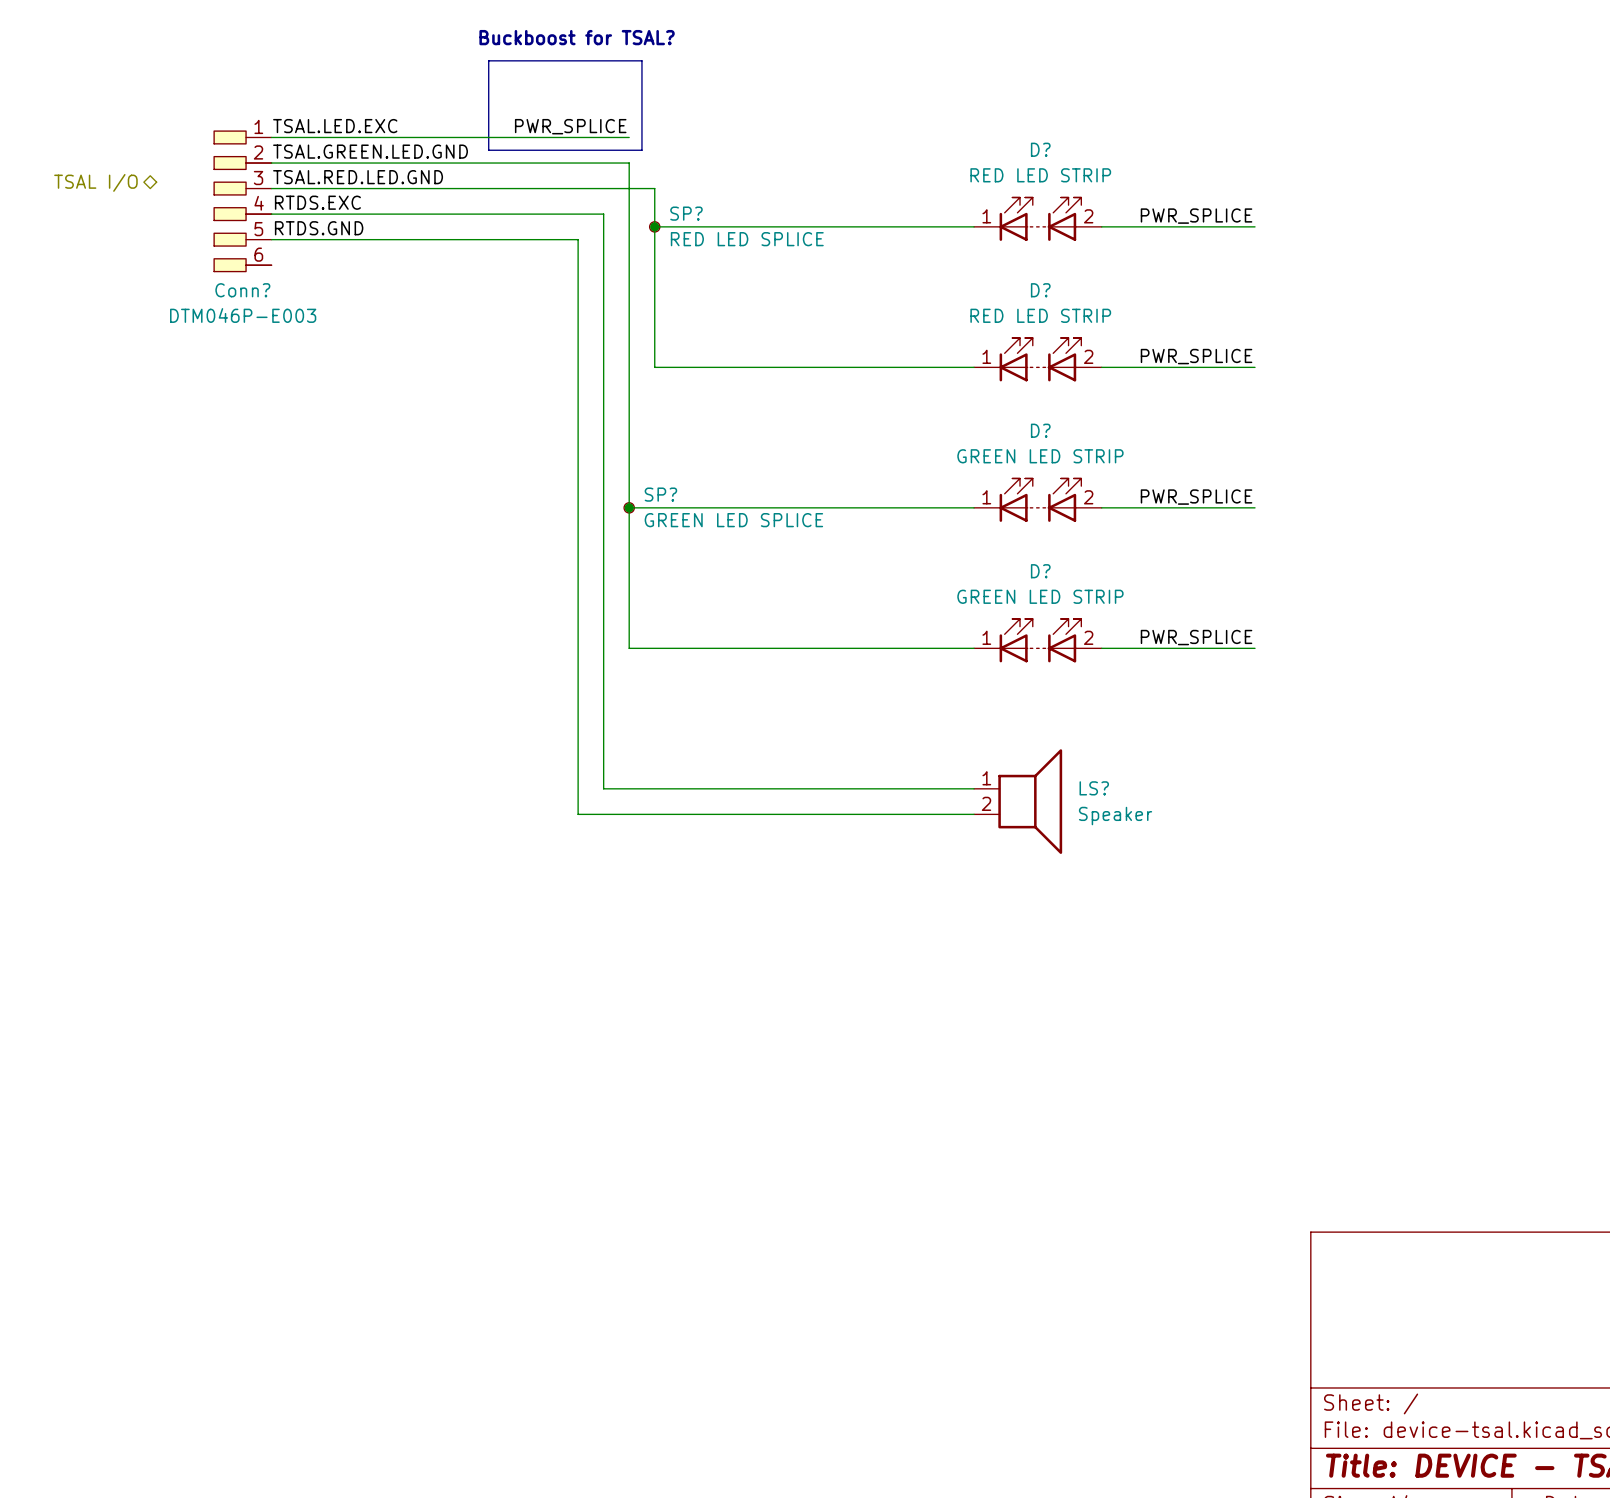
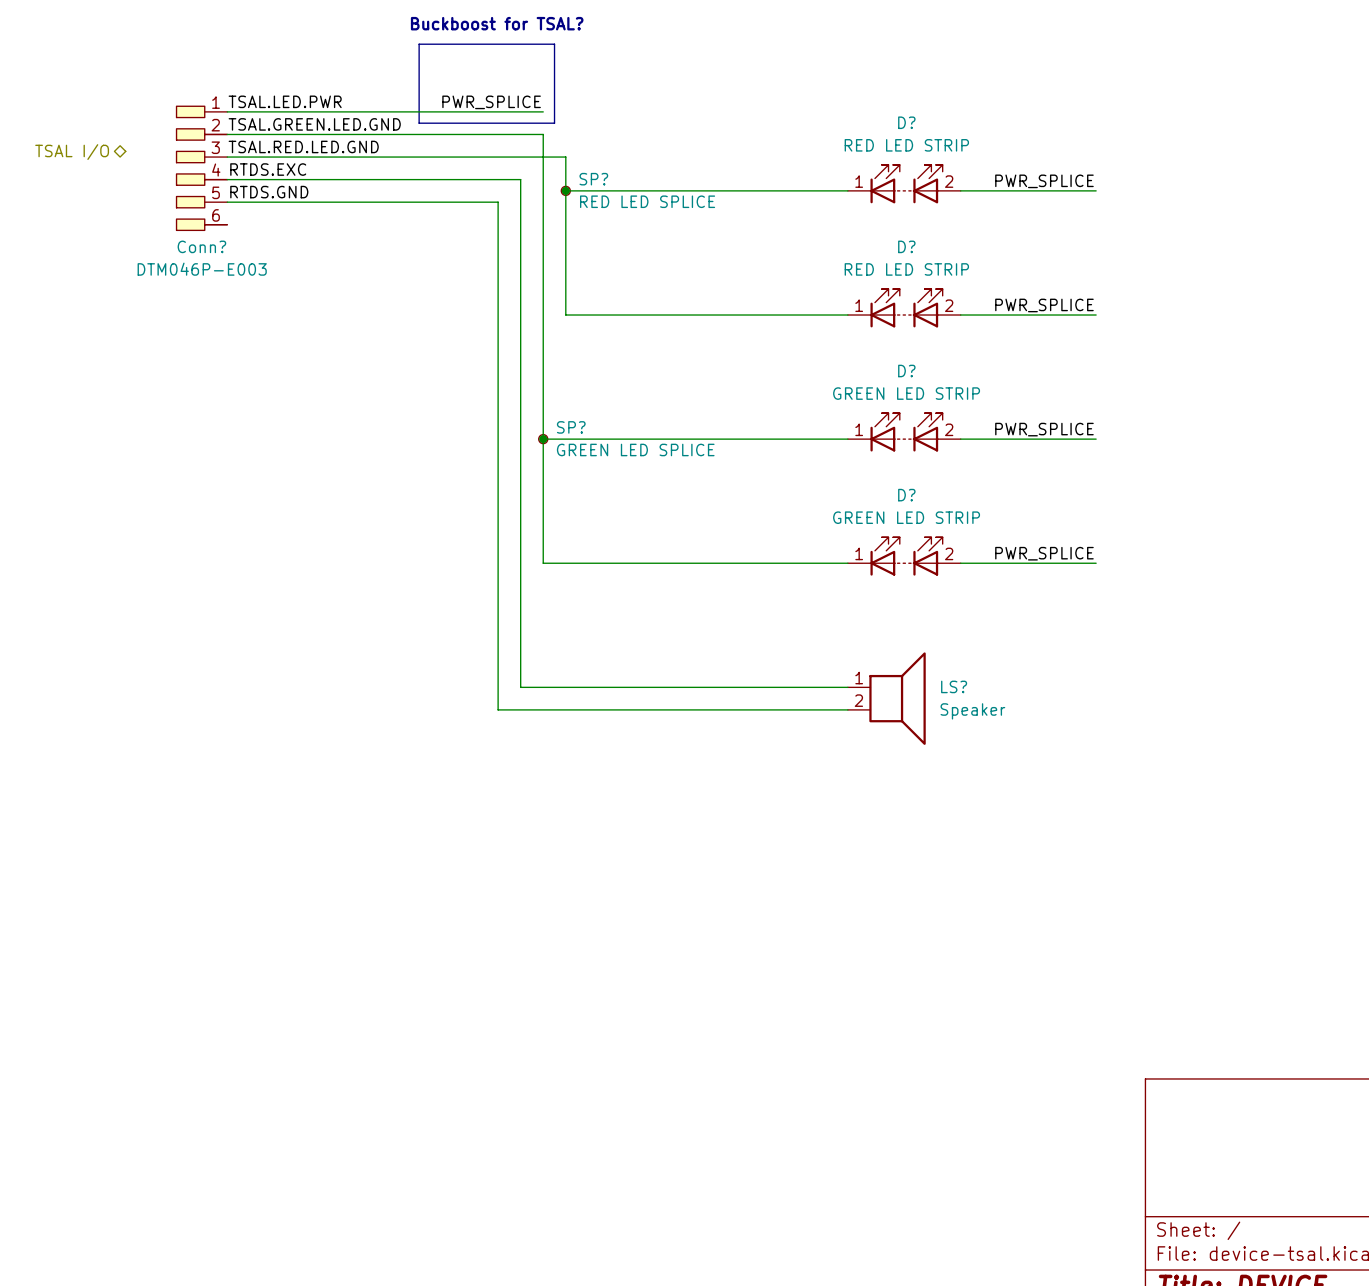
label: TSAL.LED.EXC (335, 126) -> TSAL.LED.PWR (285, 101)

